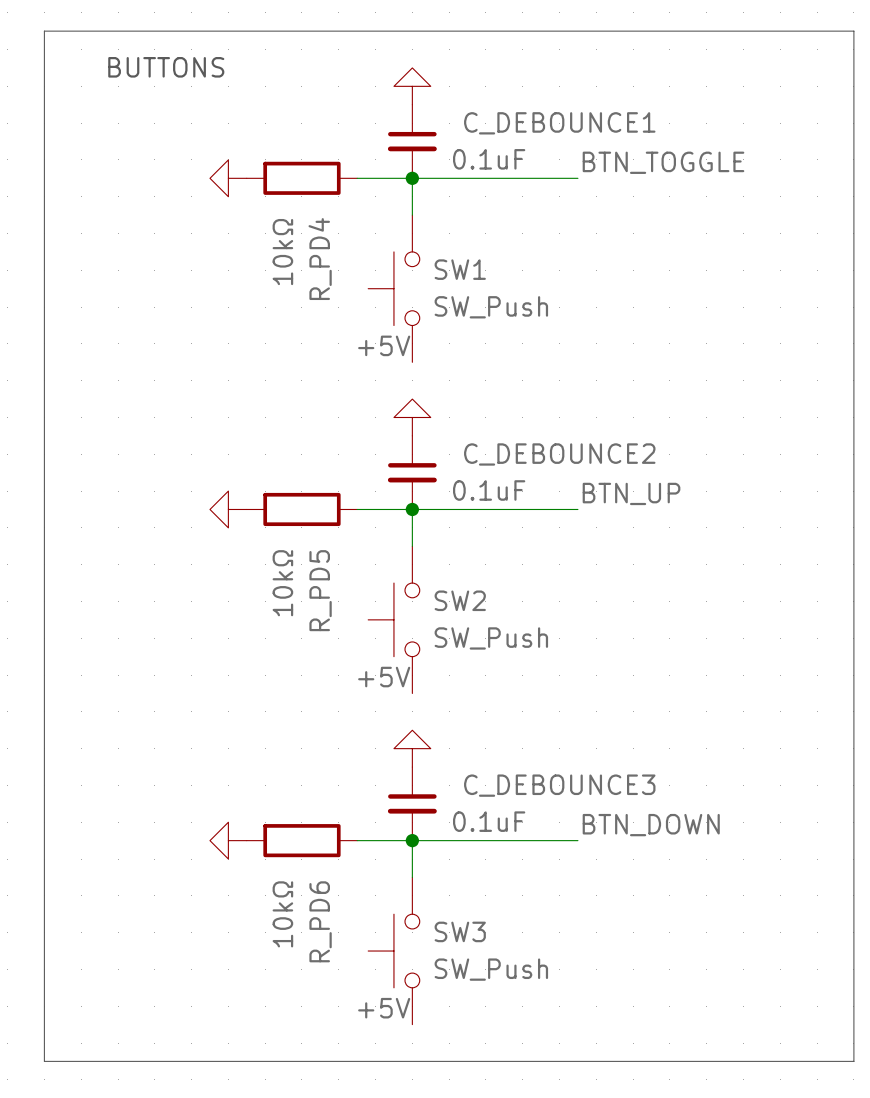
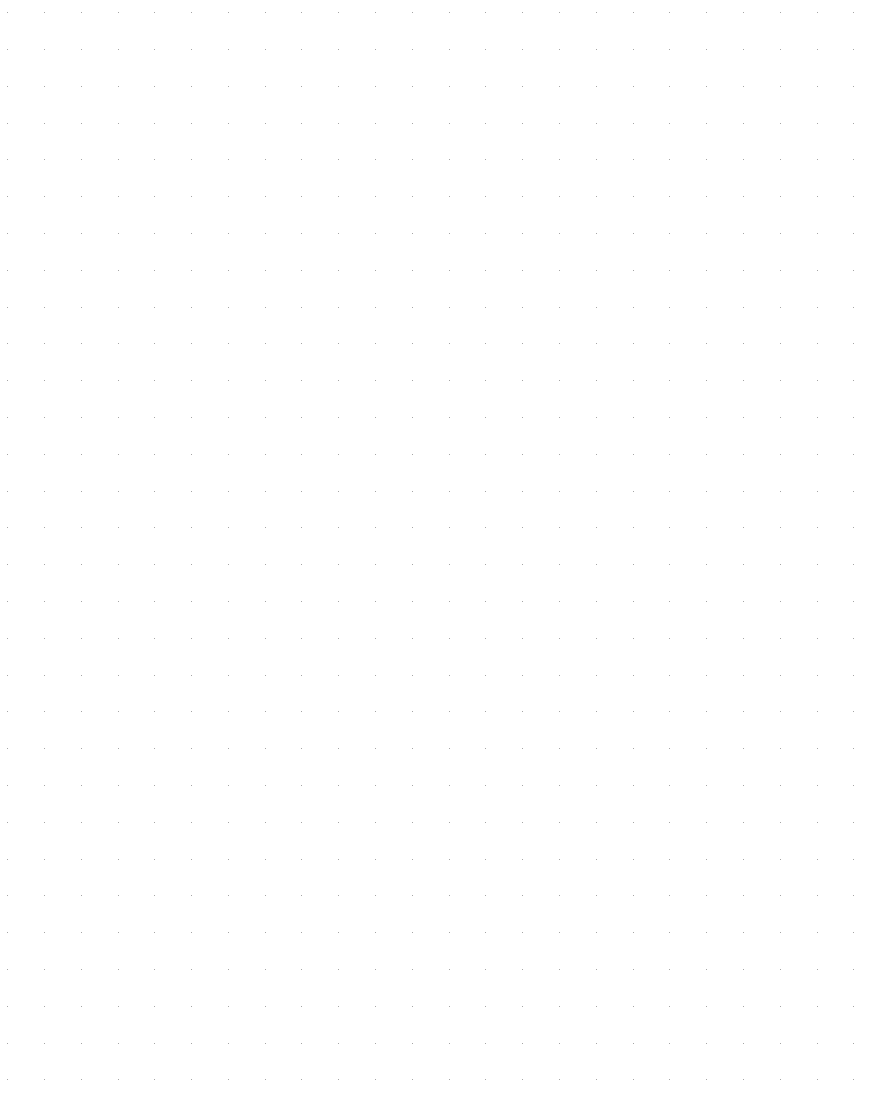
line: (44, 31) (853, 31) (853, 1061) (44, 1061) (44, 31) -> none
text: BUTTONS (166, 67) -> none
power symbol: (412, 86) -> none
C_DEBOUNCE1: 0.1uF (412, 141) -> none
label: BTN_TOGGLE (663, 162) -> none
power symbol: (228, 178) -> none
R_PD4: 10kΩ (301, 178) -> none
wire: (357, 178) (577, 178) -> none
wire: (412, 178) (412, 215) -> none
junction: (412, 178) -> none
SW1: SW_Push (393, 288) -> none
label: +5V (384, 345) -> none
power symbol: (412, 417) -> none
C_DEBOUNCE2: 0.1uF (412, 472) -> none
label: BTN_UP (631, 493) -> none
power symbol: (228, 509) -> none
R_PD5: 10kΩ (301, 509) -> none
wire: (357, 509) (577, 509) -> none
wire: (412, 509) (412, 546) -> none
junction: (412, 509) -> none
SW2: SW_Push (393, 619) -> none
label: +5V (384, 677) -> none
power symbol: (412, 748) -> none
C_DEBOUNCE3: 0.1uF (412, 803) -> none
label: BTN_DOWN (651, 825) -> none
power symbol: (228, 840) -> none
R_PD6: 10kΩ (301, 840) -> none
wire: (357, 840) (577, 840) -> none
wire: (412, 840) (412, 877) -> none
junction: (412, 840) -> none
SW3: SW_Push (393, 951) -> none
label: +5V (384, 1008) -> none

